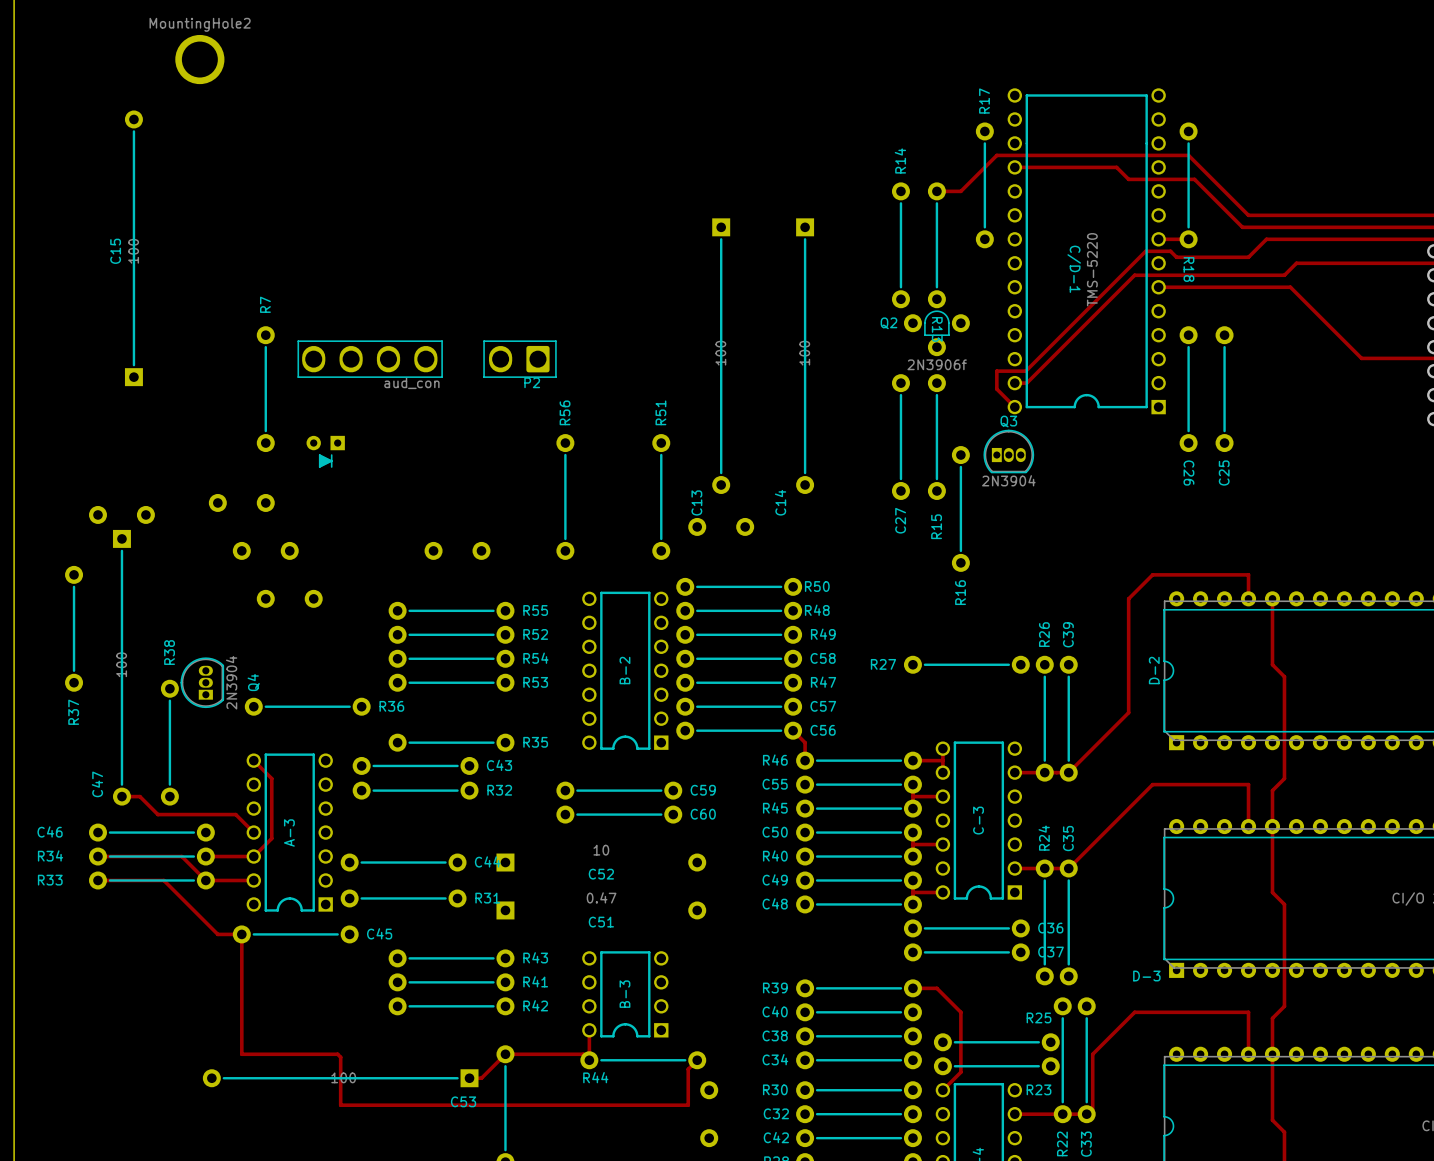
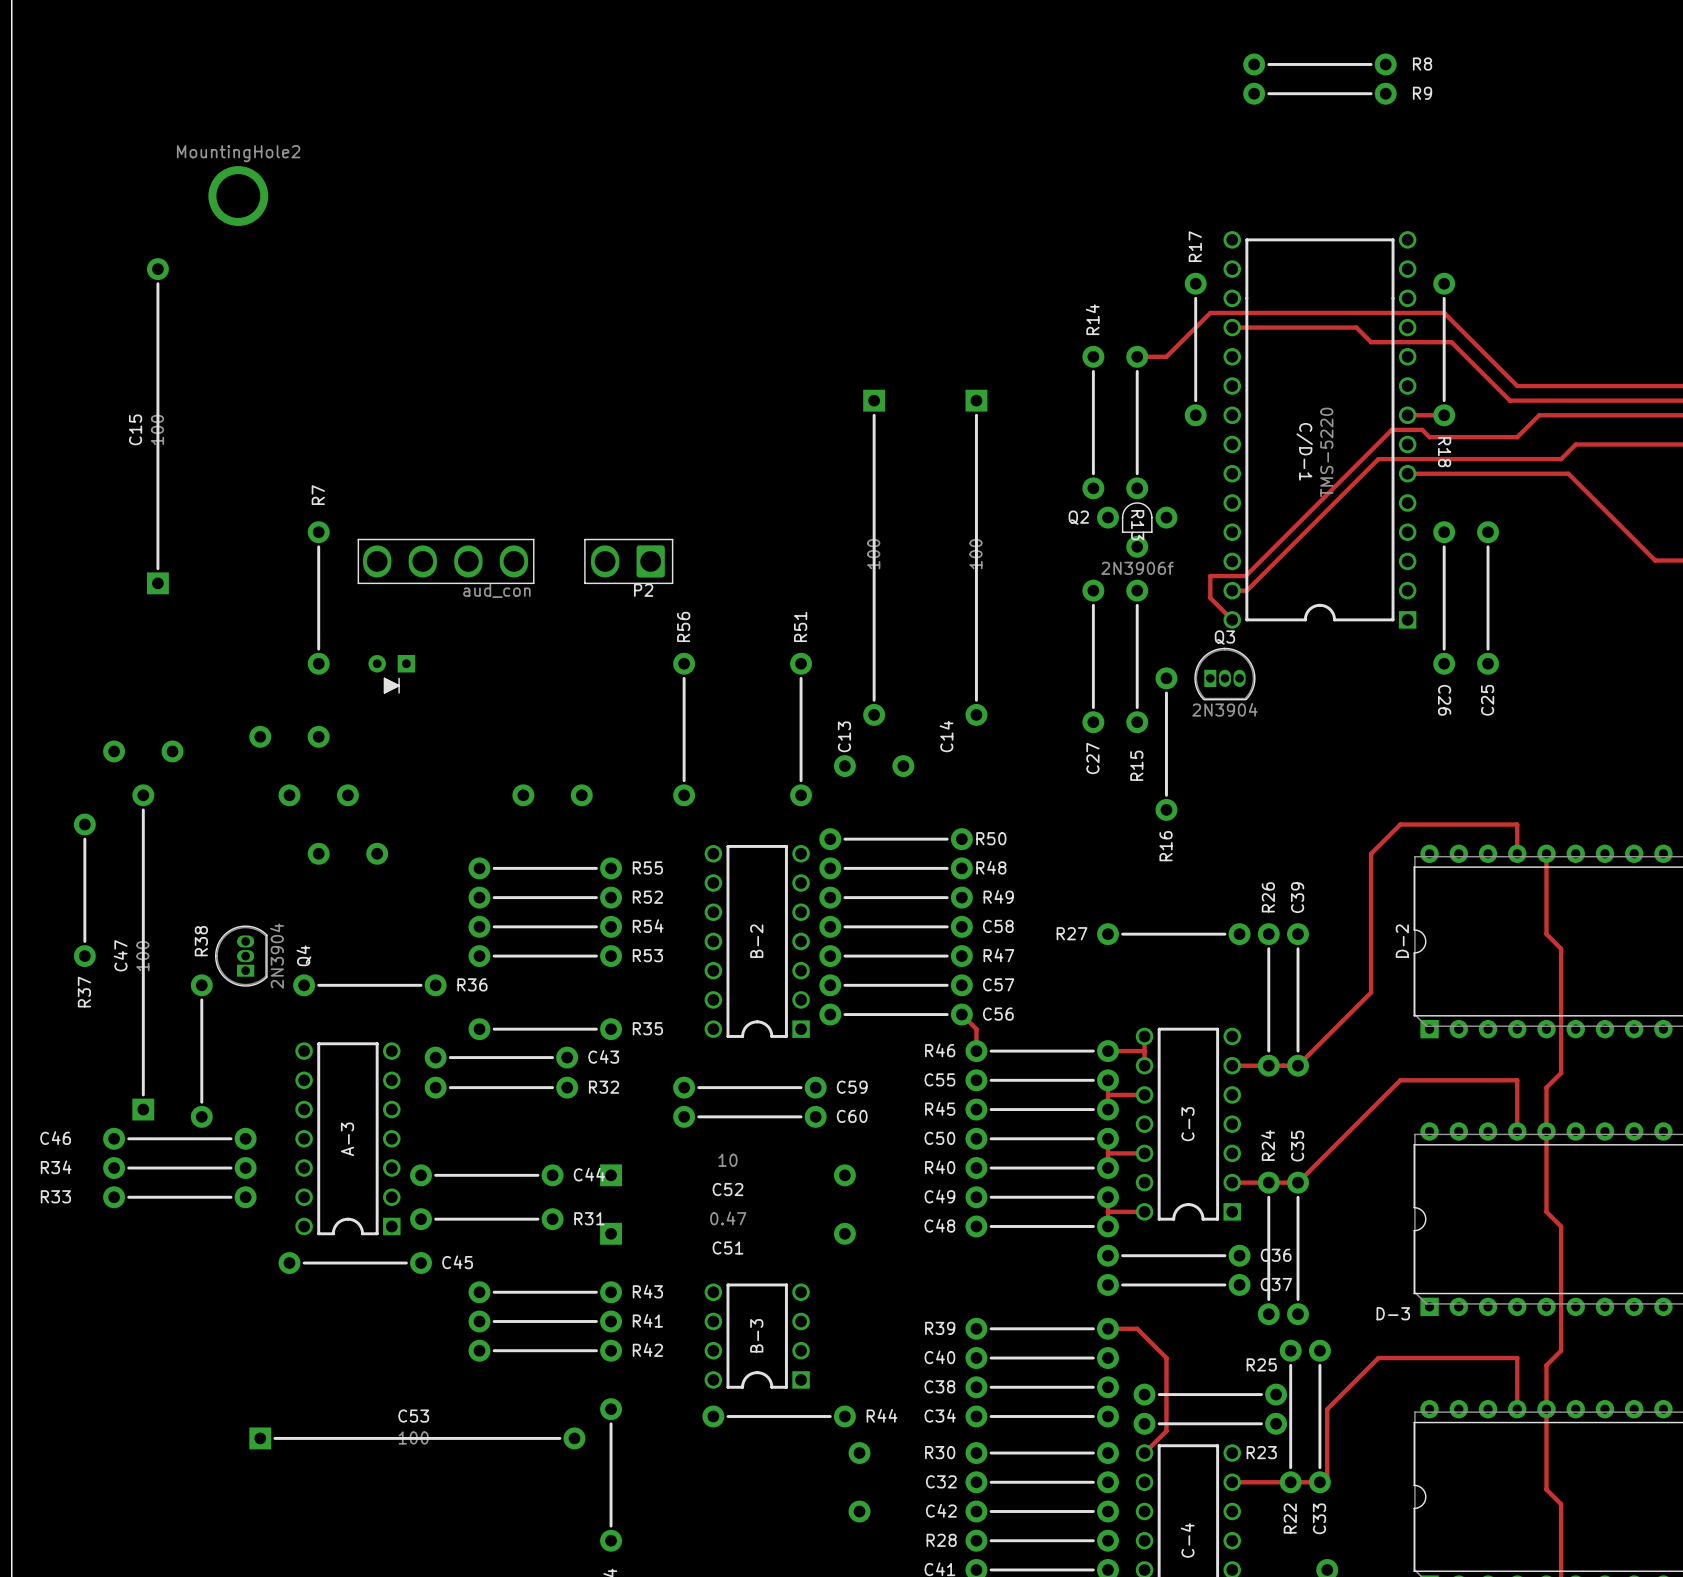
C47 rotation: 0° (121, 667) -> 180° (143, 952)
R38 position: (169, 742) -> (201, 1051)
track: (253, 760) (271, 778) (271, 838) (253, 856) (205, 856) -> none
C47 name position: C47 (97, 784) -> C47 (120, 955)
track: (121, 796) (139, 796) (157, 814) (235, 814) (253, 832) -> none
track: (97, 856) (181, 856) (205, 880) (253, 880) -> none
track: (97, 880) (163, 880) (217, 934) (241, 934) (241, 1054) (337, 1054) (340, 1057) (340, 1105) (688, 1105) (688, 1069) (697, 1060) -> none
track: (589, 1030) (589, 1060) (583, 1054) (505, 1054) (481, 1078) (469, 1078) -> none
R44 name position: R44 (595, 1077) -> R44 (881, 1415)
C53 rotation: 0° (340, 1078) -> 180° (417, 1438)
C53 name position: C53 (463, 1101) -> C53 (413, 1416)

